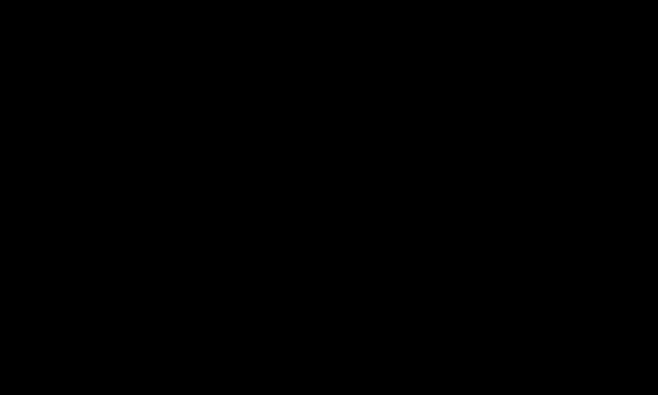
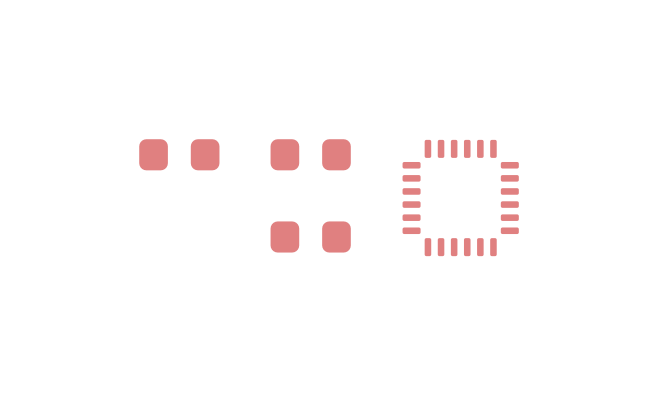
part: none -> (179, 154)
part: none -> (310, 154)
part: none -> (460, 198)
part: none -> (310, 236)

